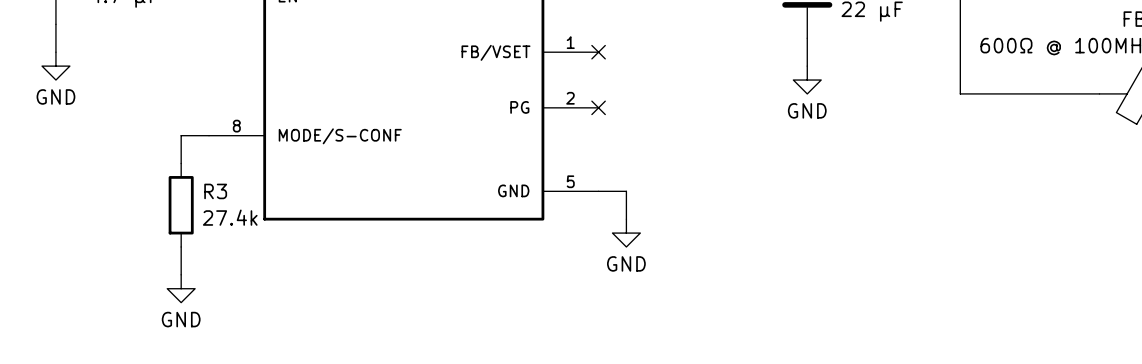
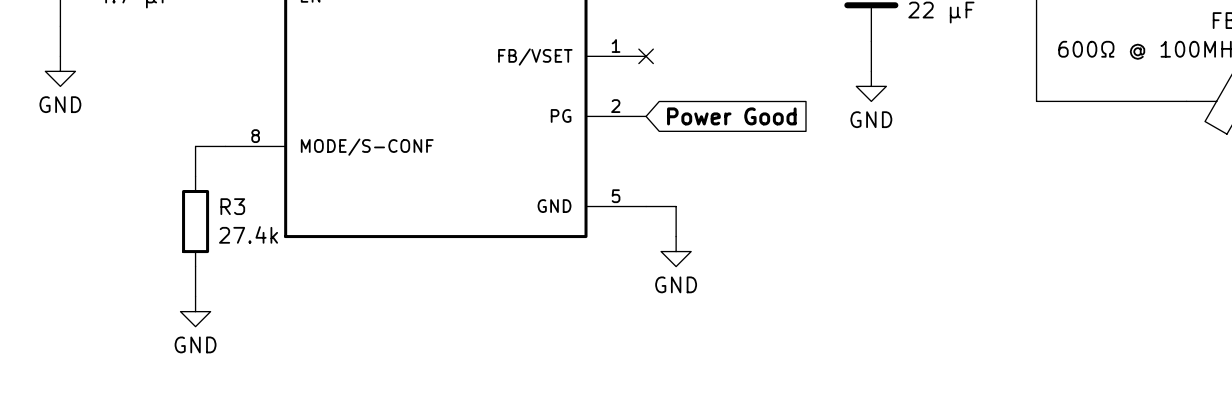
no-connect mark: (598, 107) -> none
global label: none -> Power Good (731, 116)

